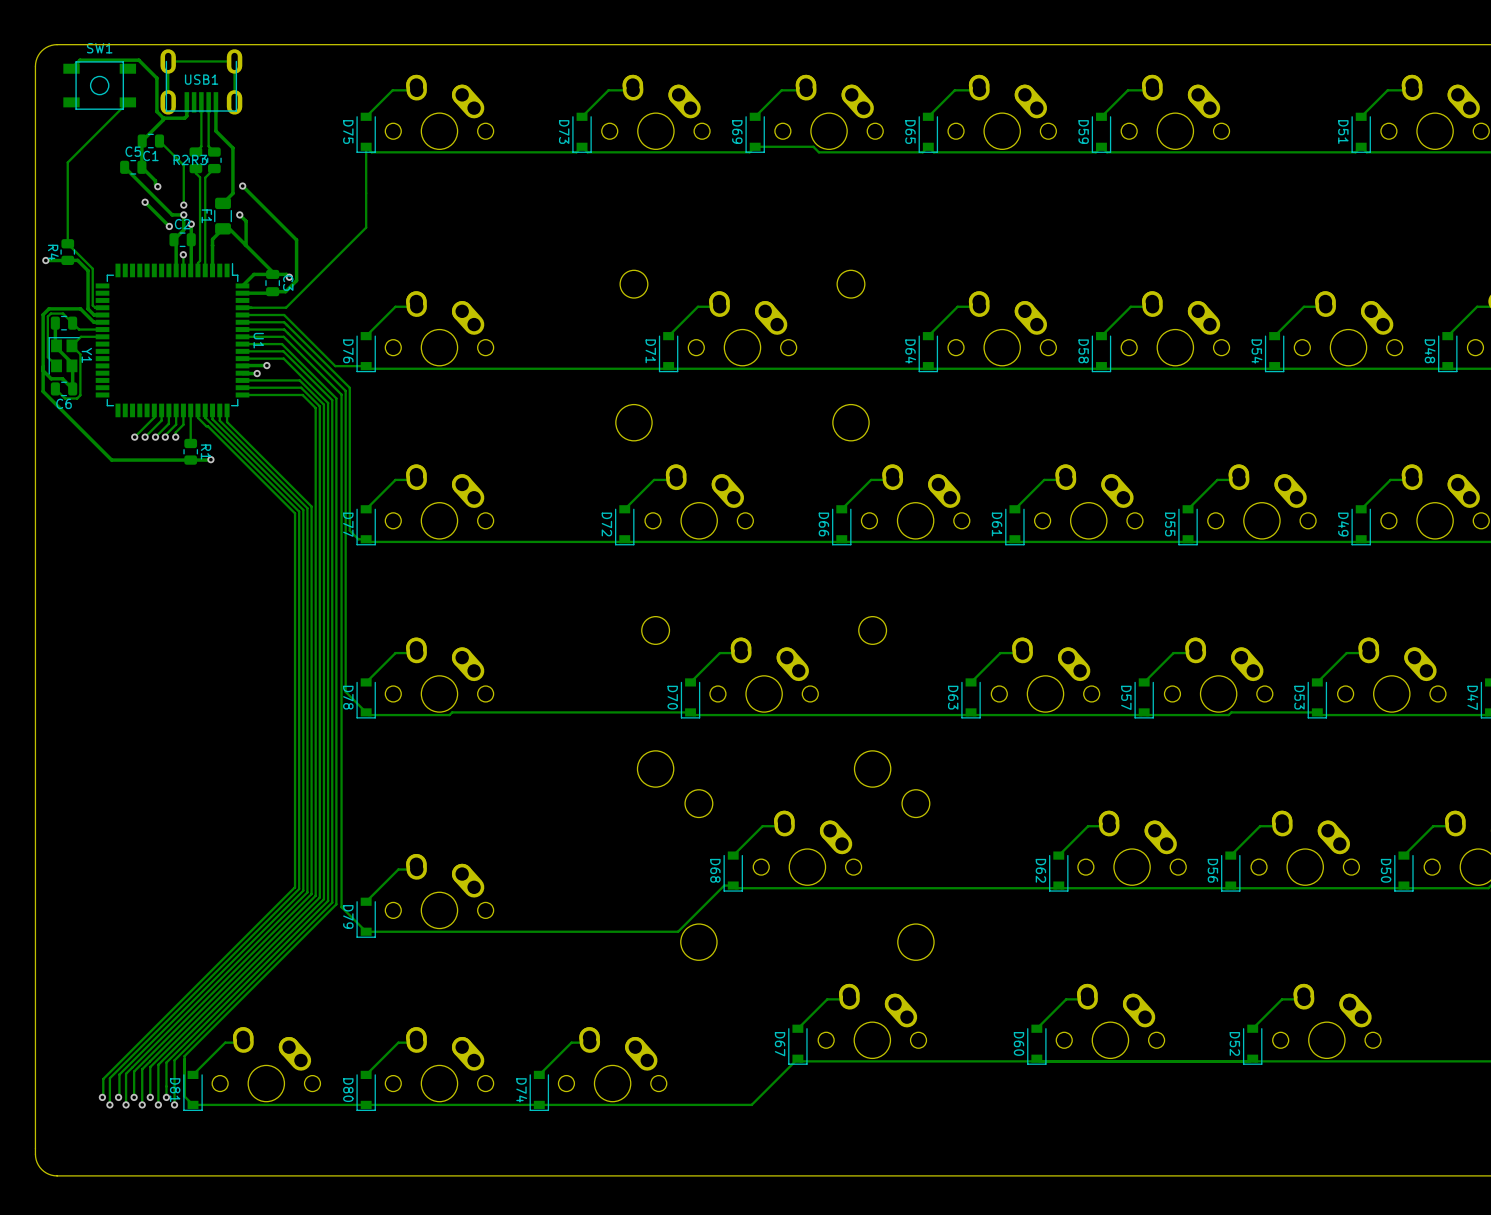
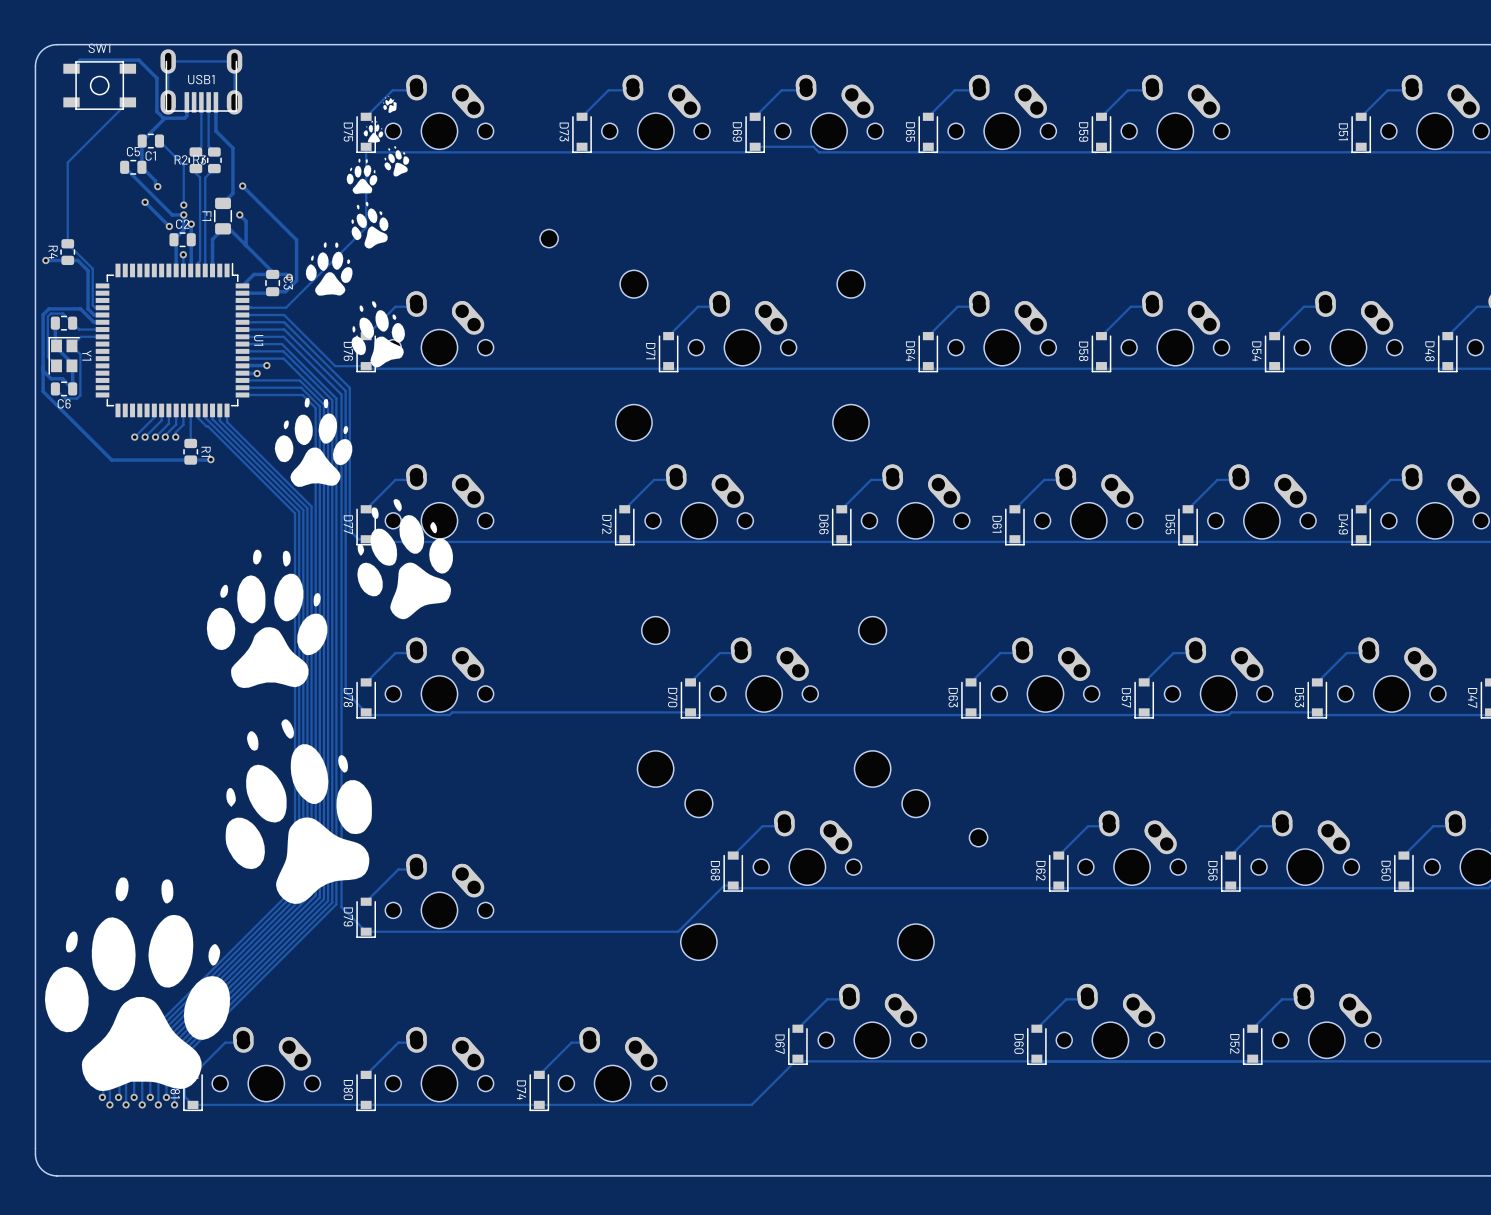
drawing: none -> [44, 95, 453, 1092]
part: none -> (549, 238)
part: none -> (978, 837)

